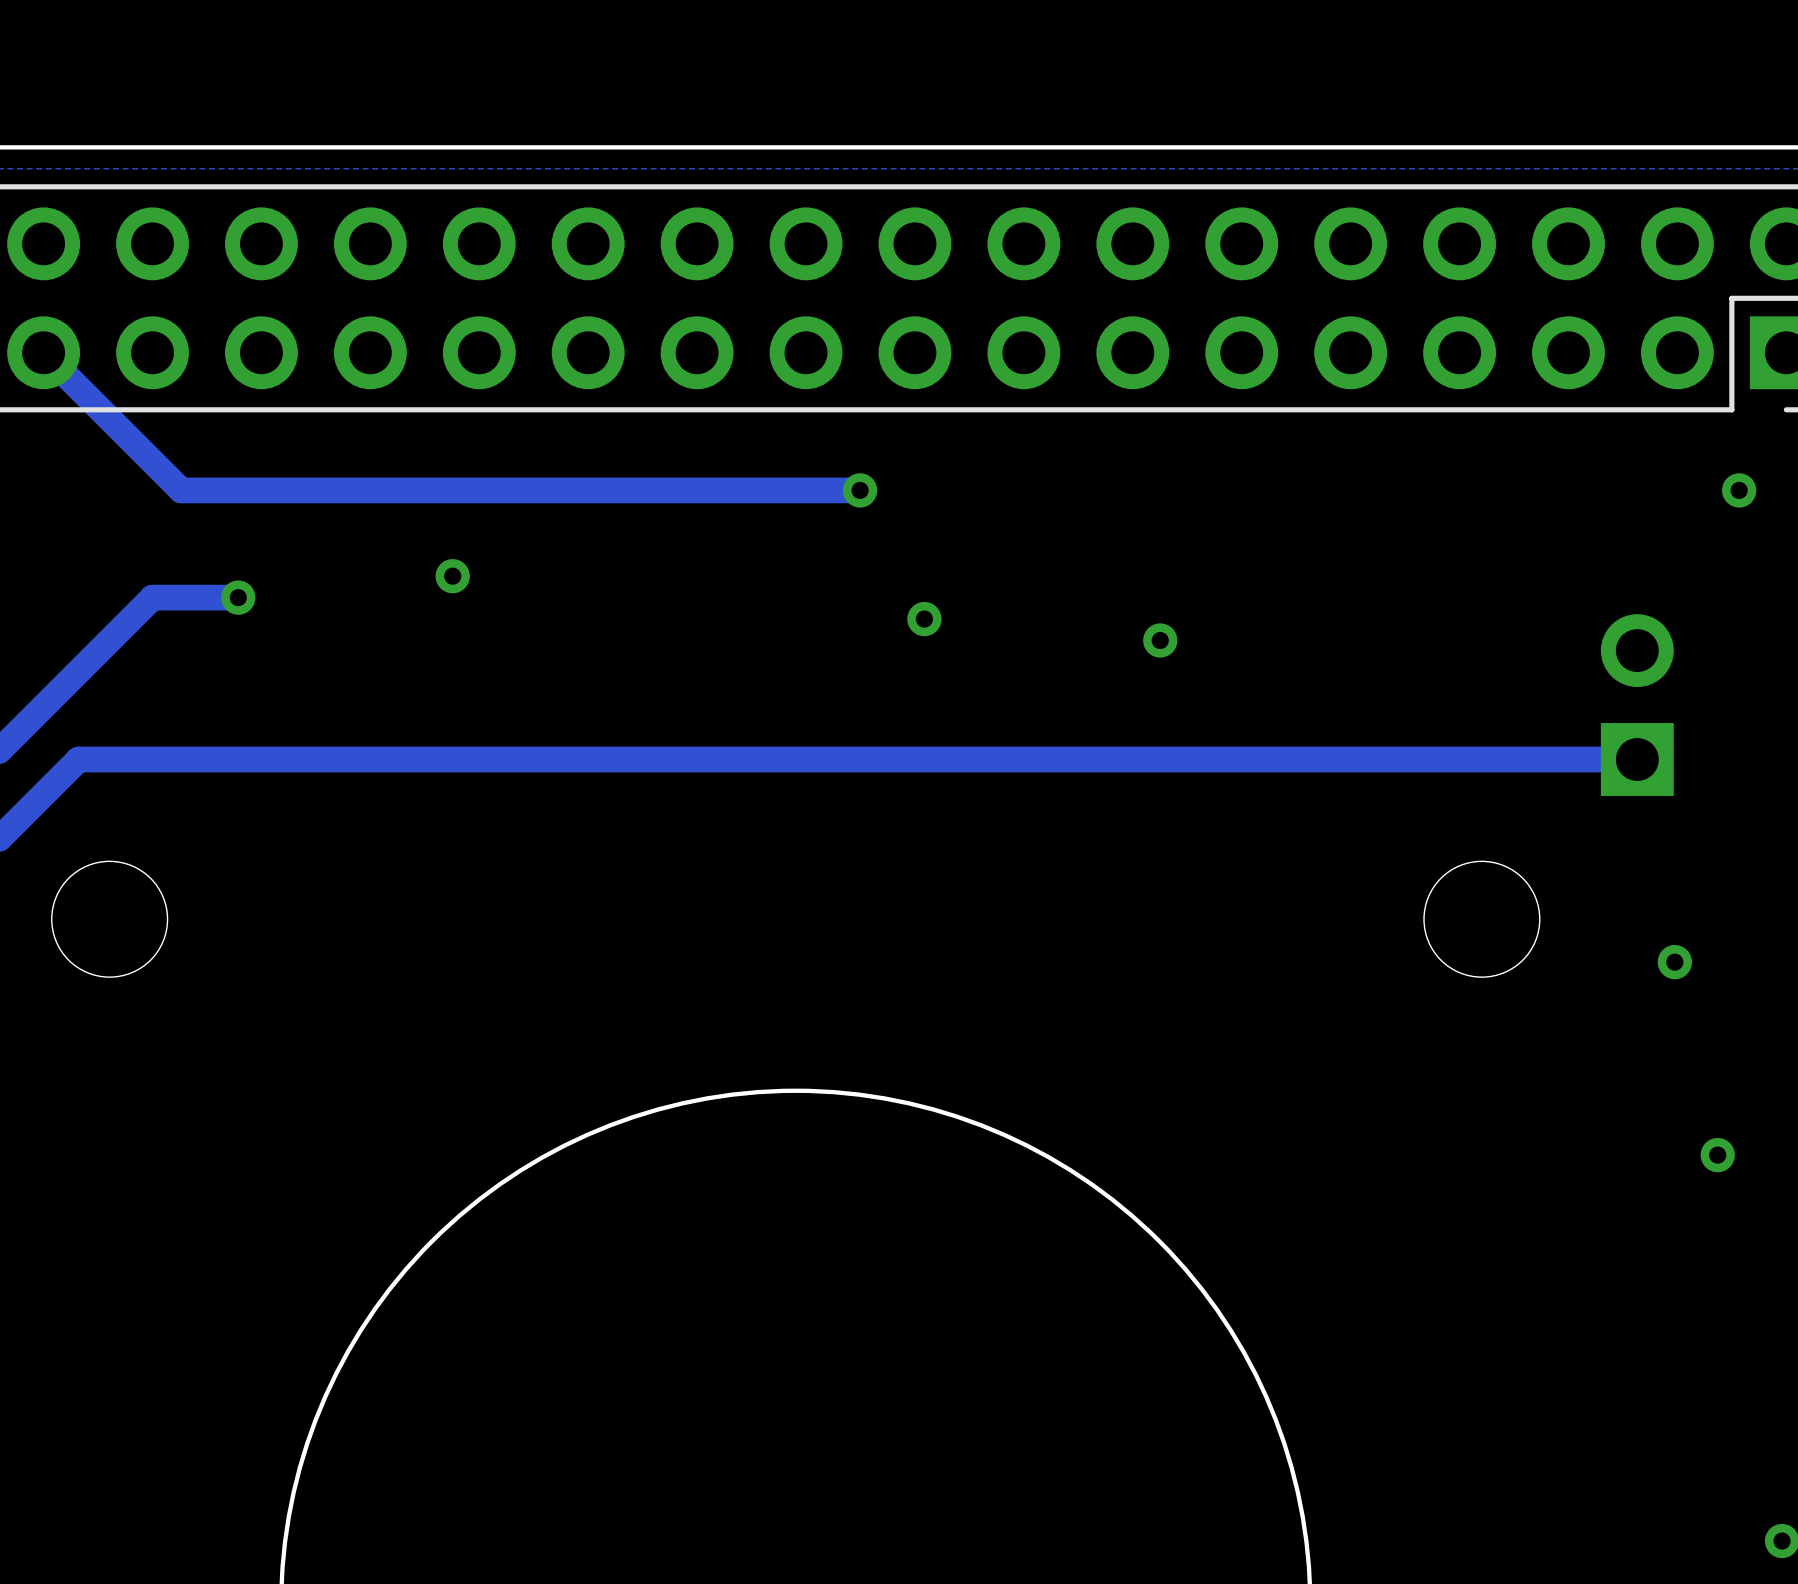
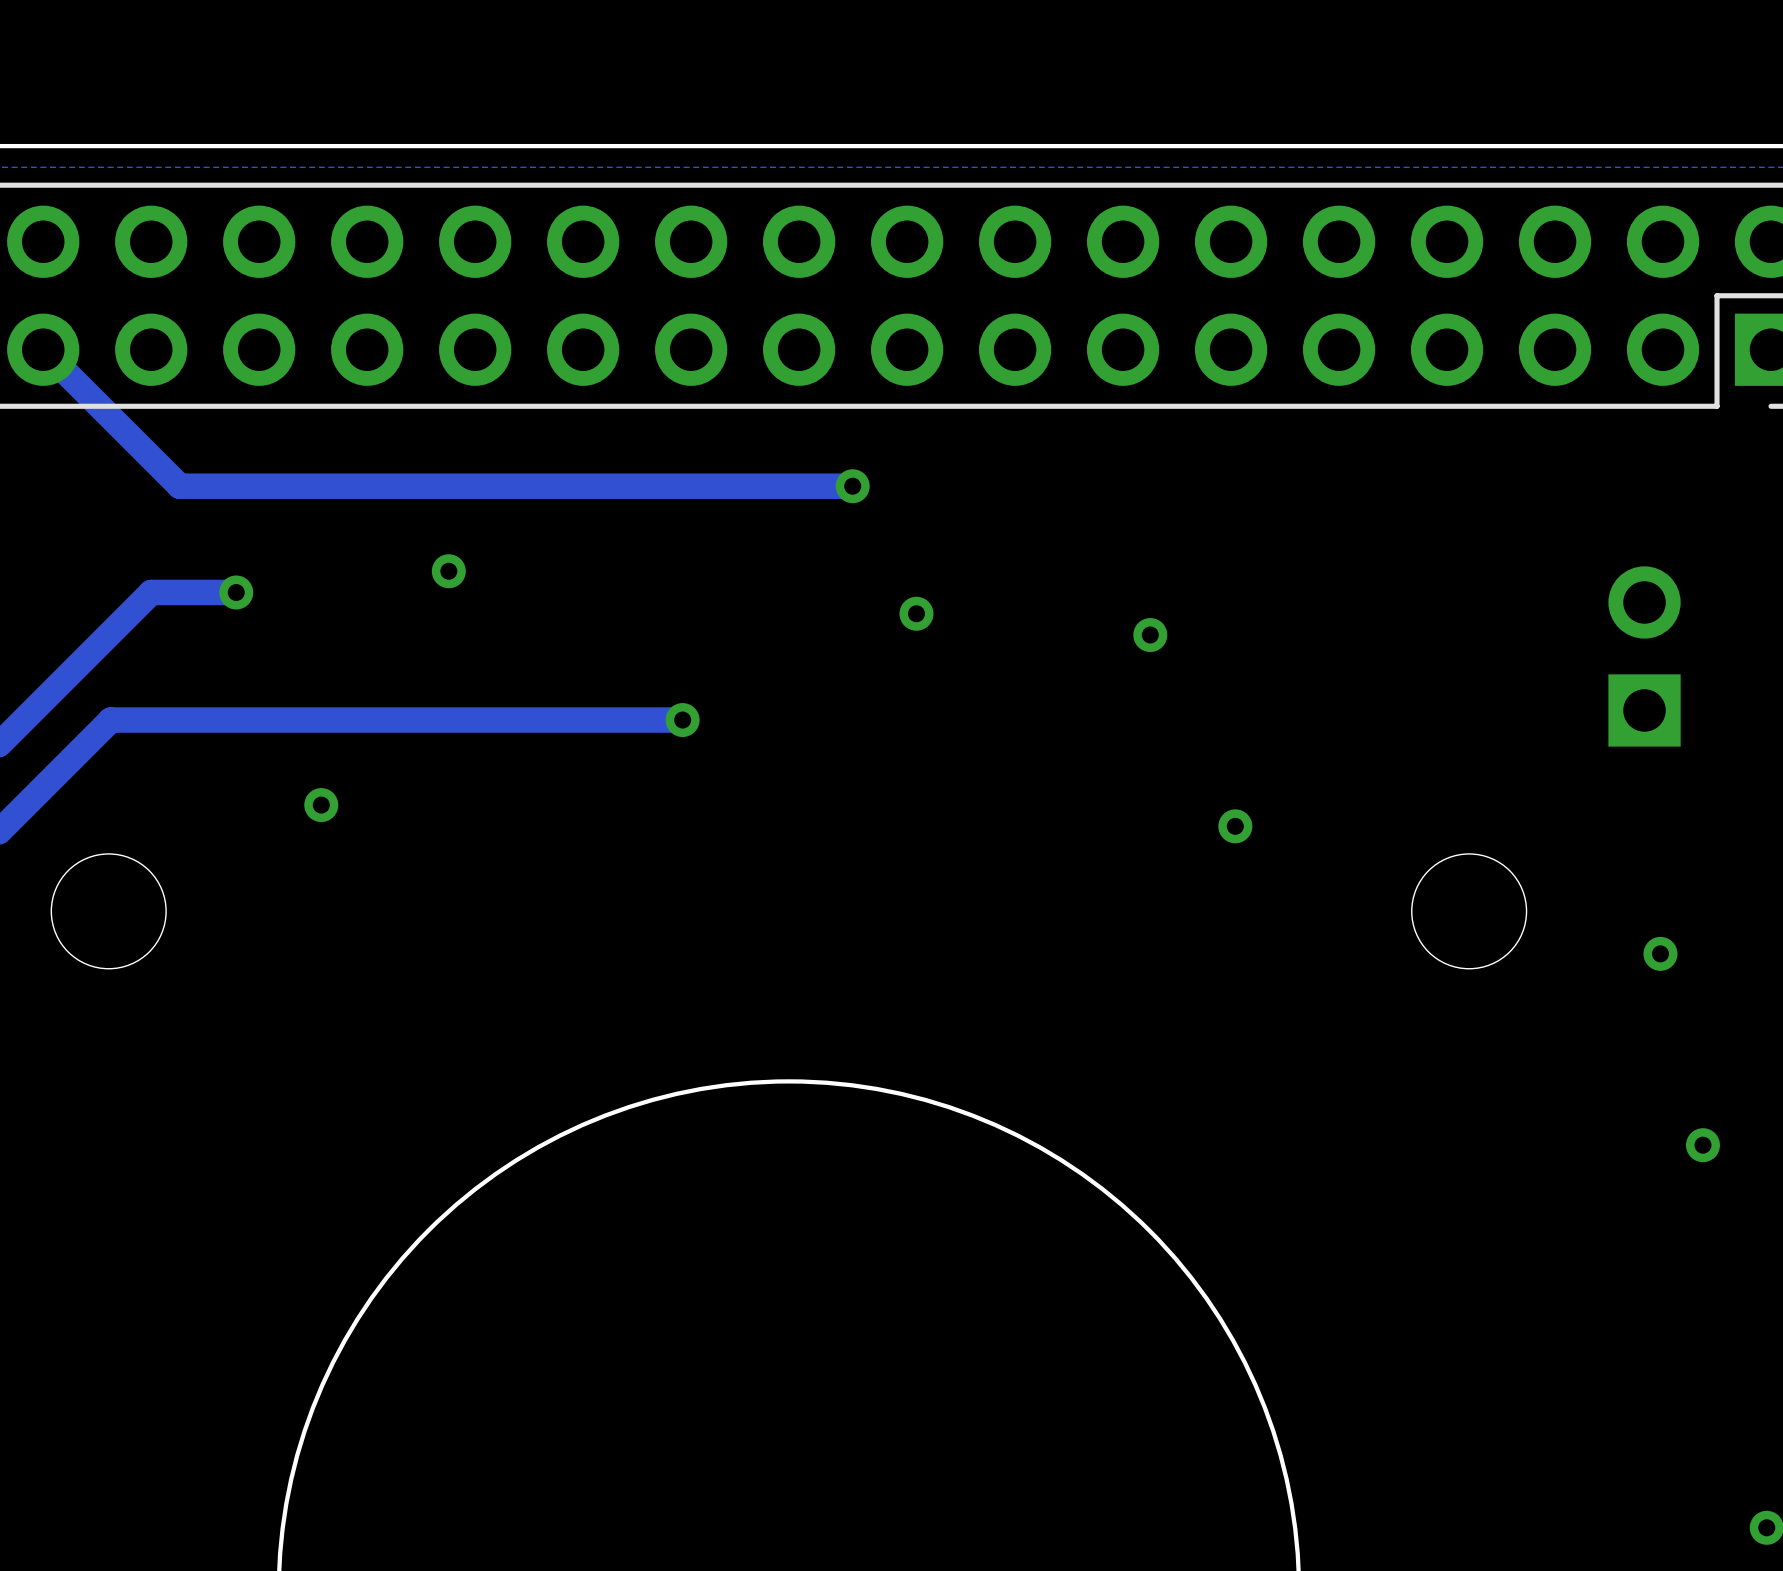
via: (1739, 490) -> none
part position: (1637, 705) -> (1644, 656)
via: none -> (682, 720)
track: (1637, 759) (78, 759) -> (682, 720) (110, 720) (77, 752)
via: none -> (321, 805)
via: none -> (1235, 826)

